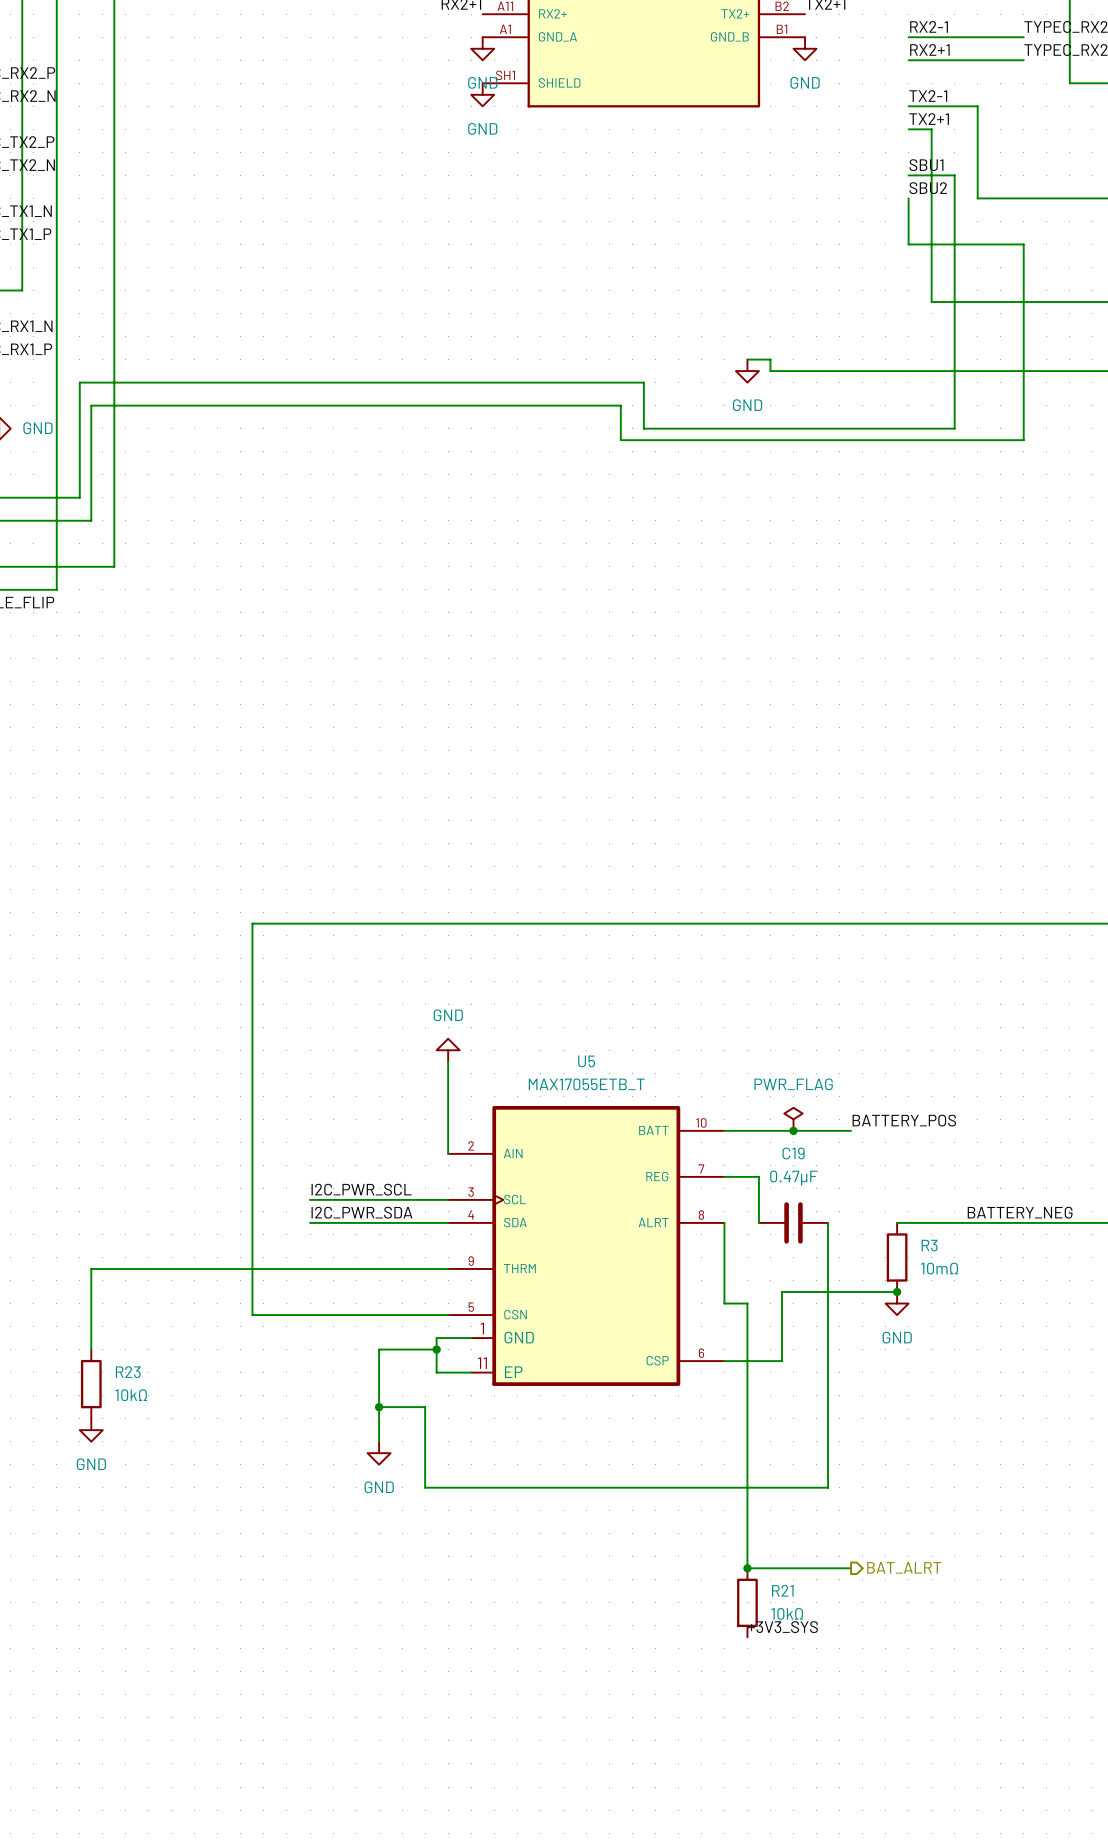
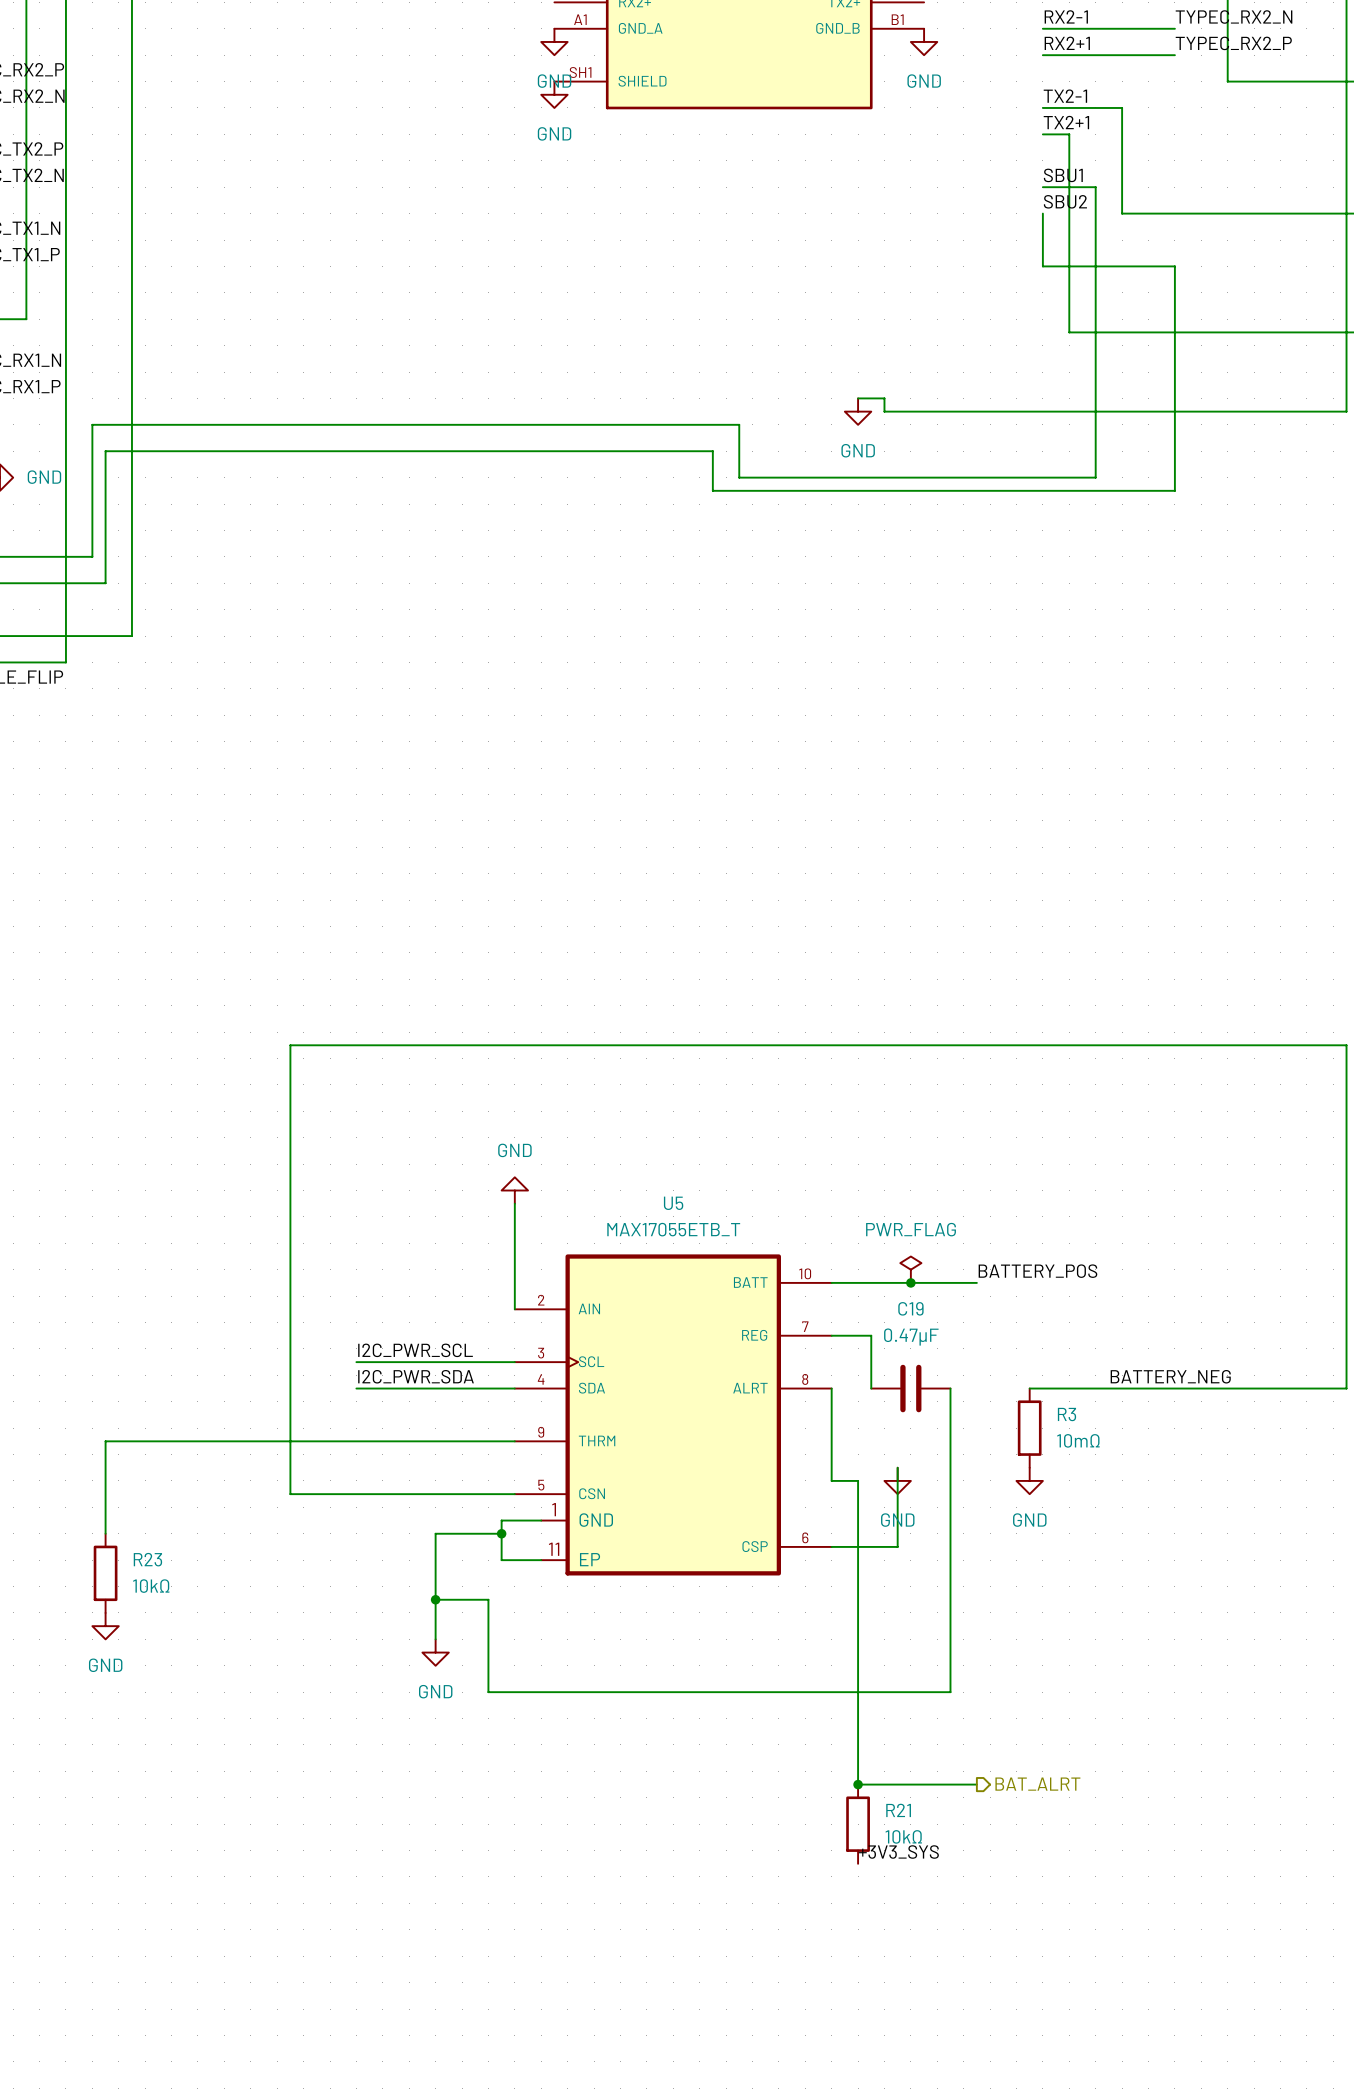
wire: (781, 1292) (897, 1292) -> none
junction: (897, 1292) -> none
power symbol: none -> GND (897, 1480)

